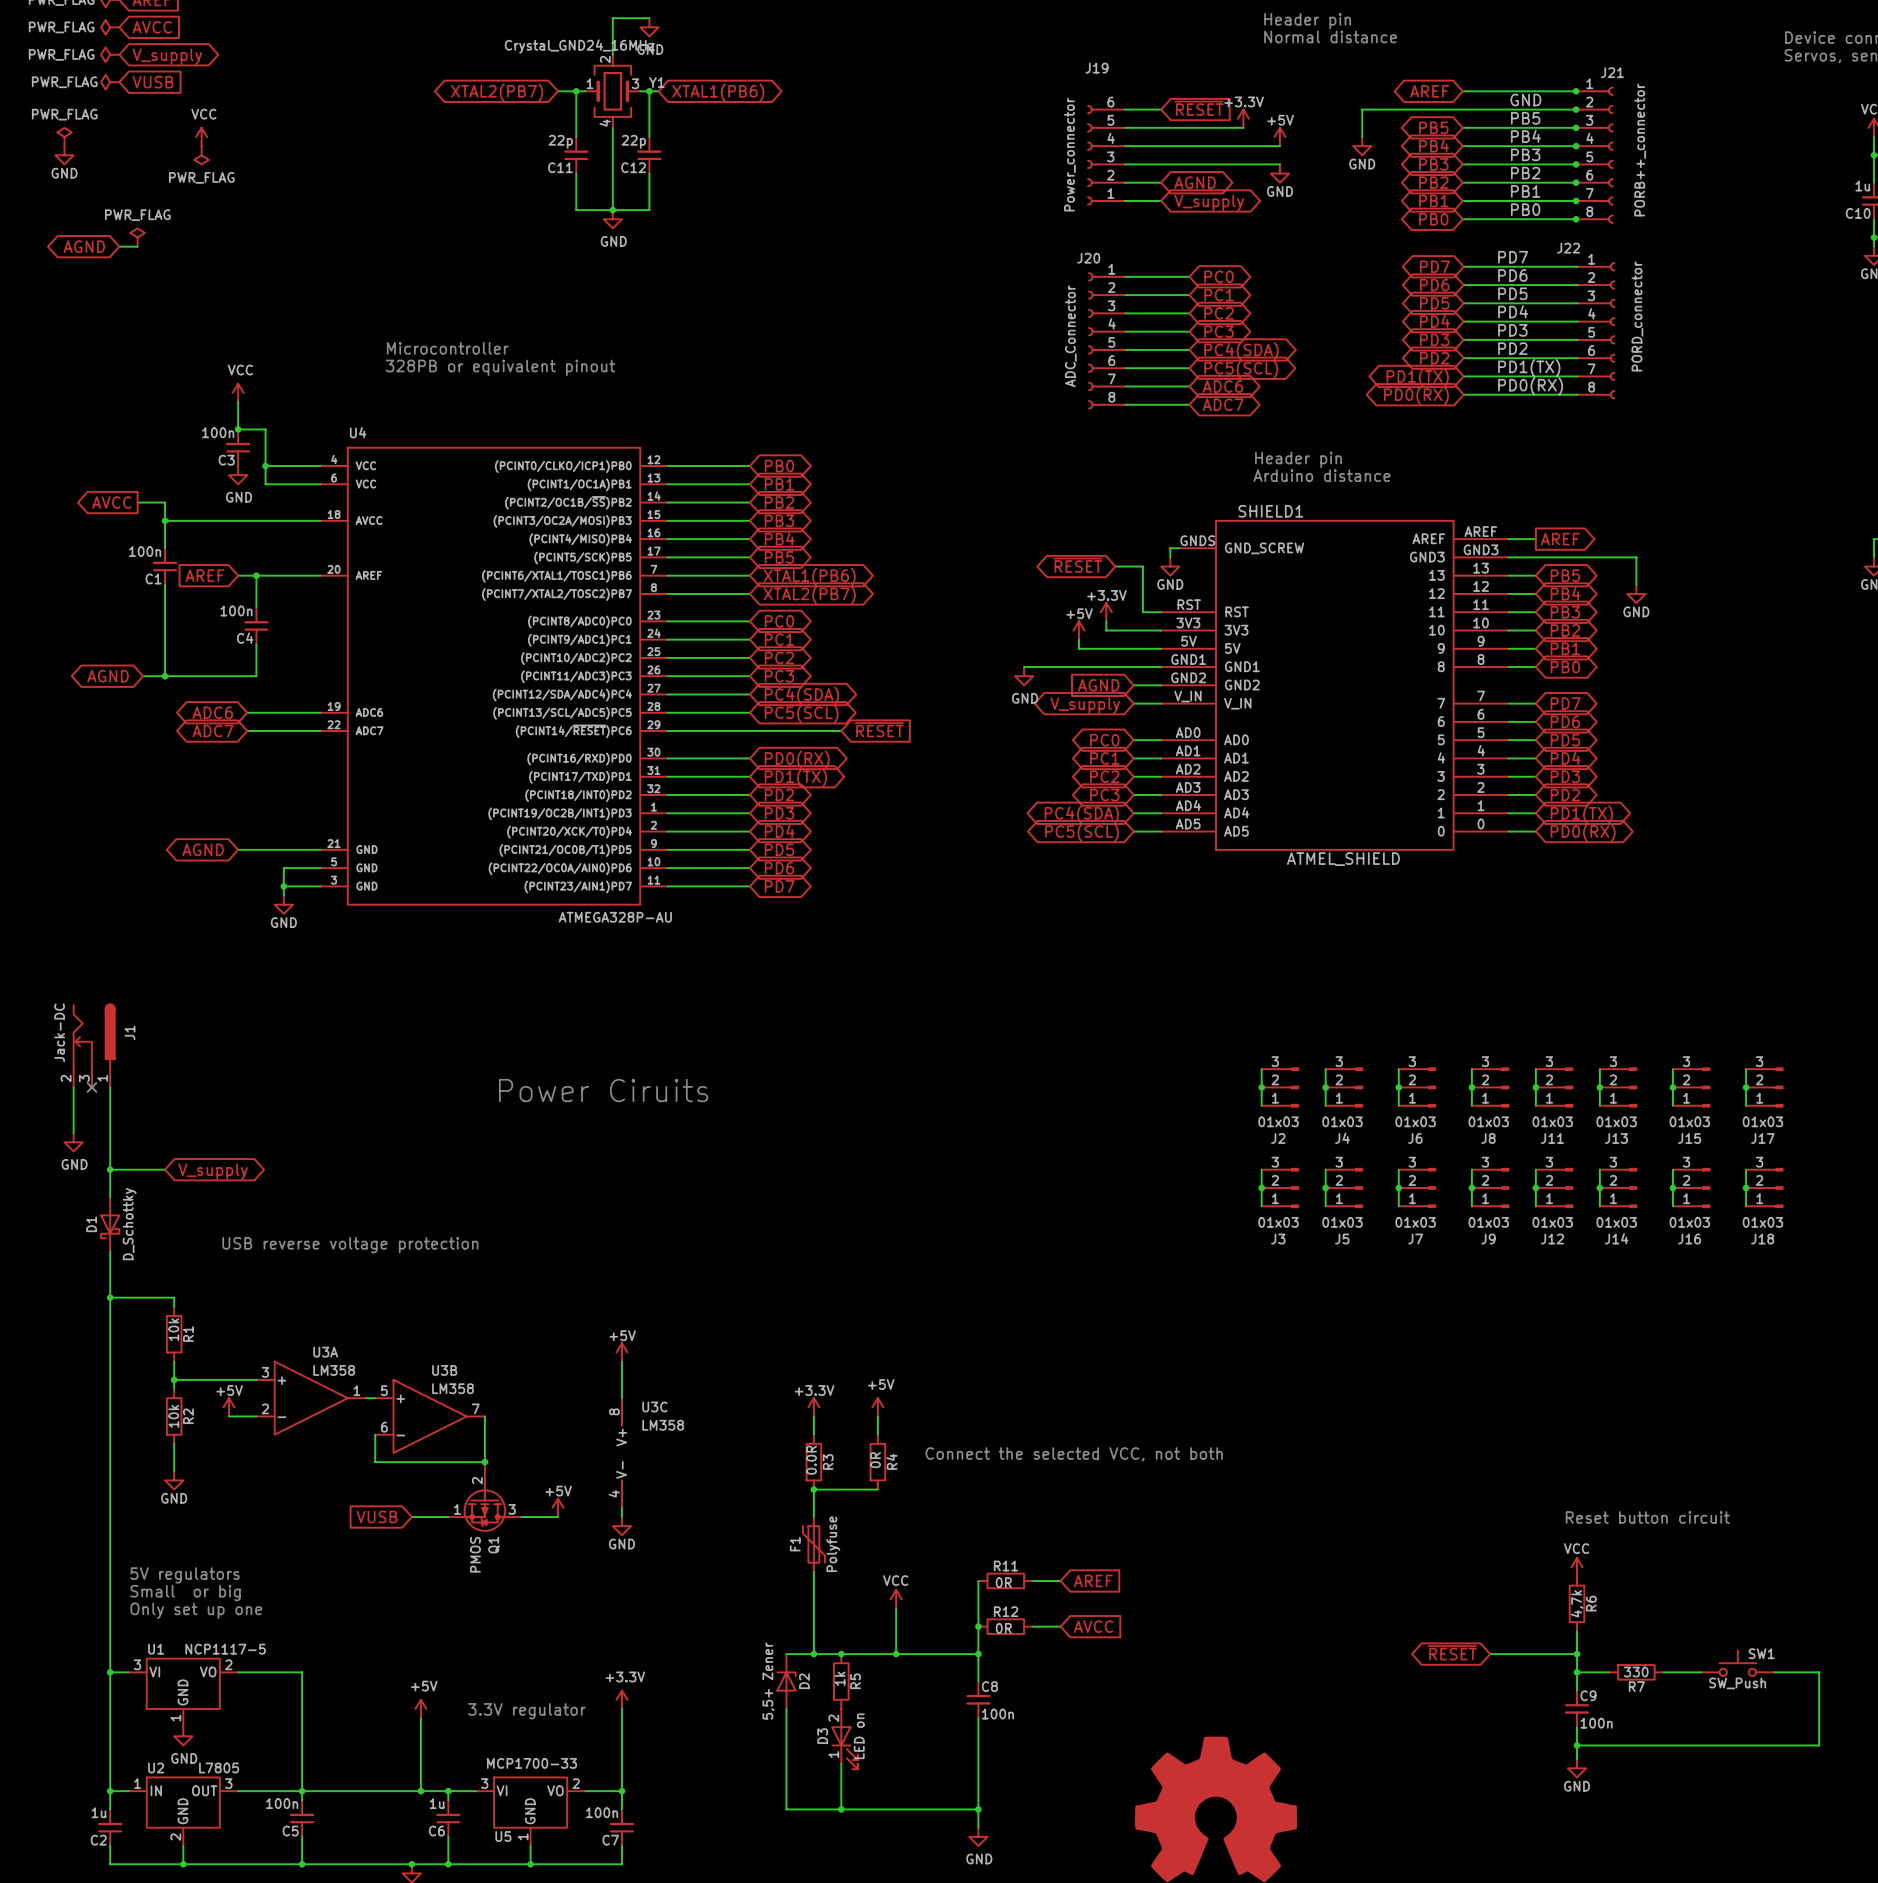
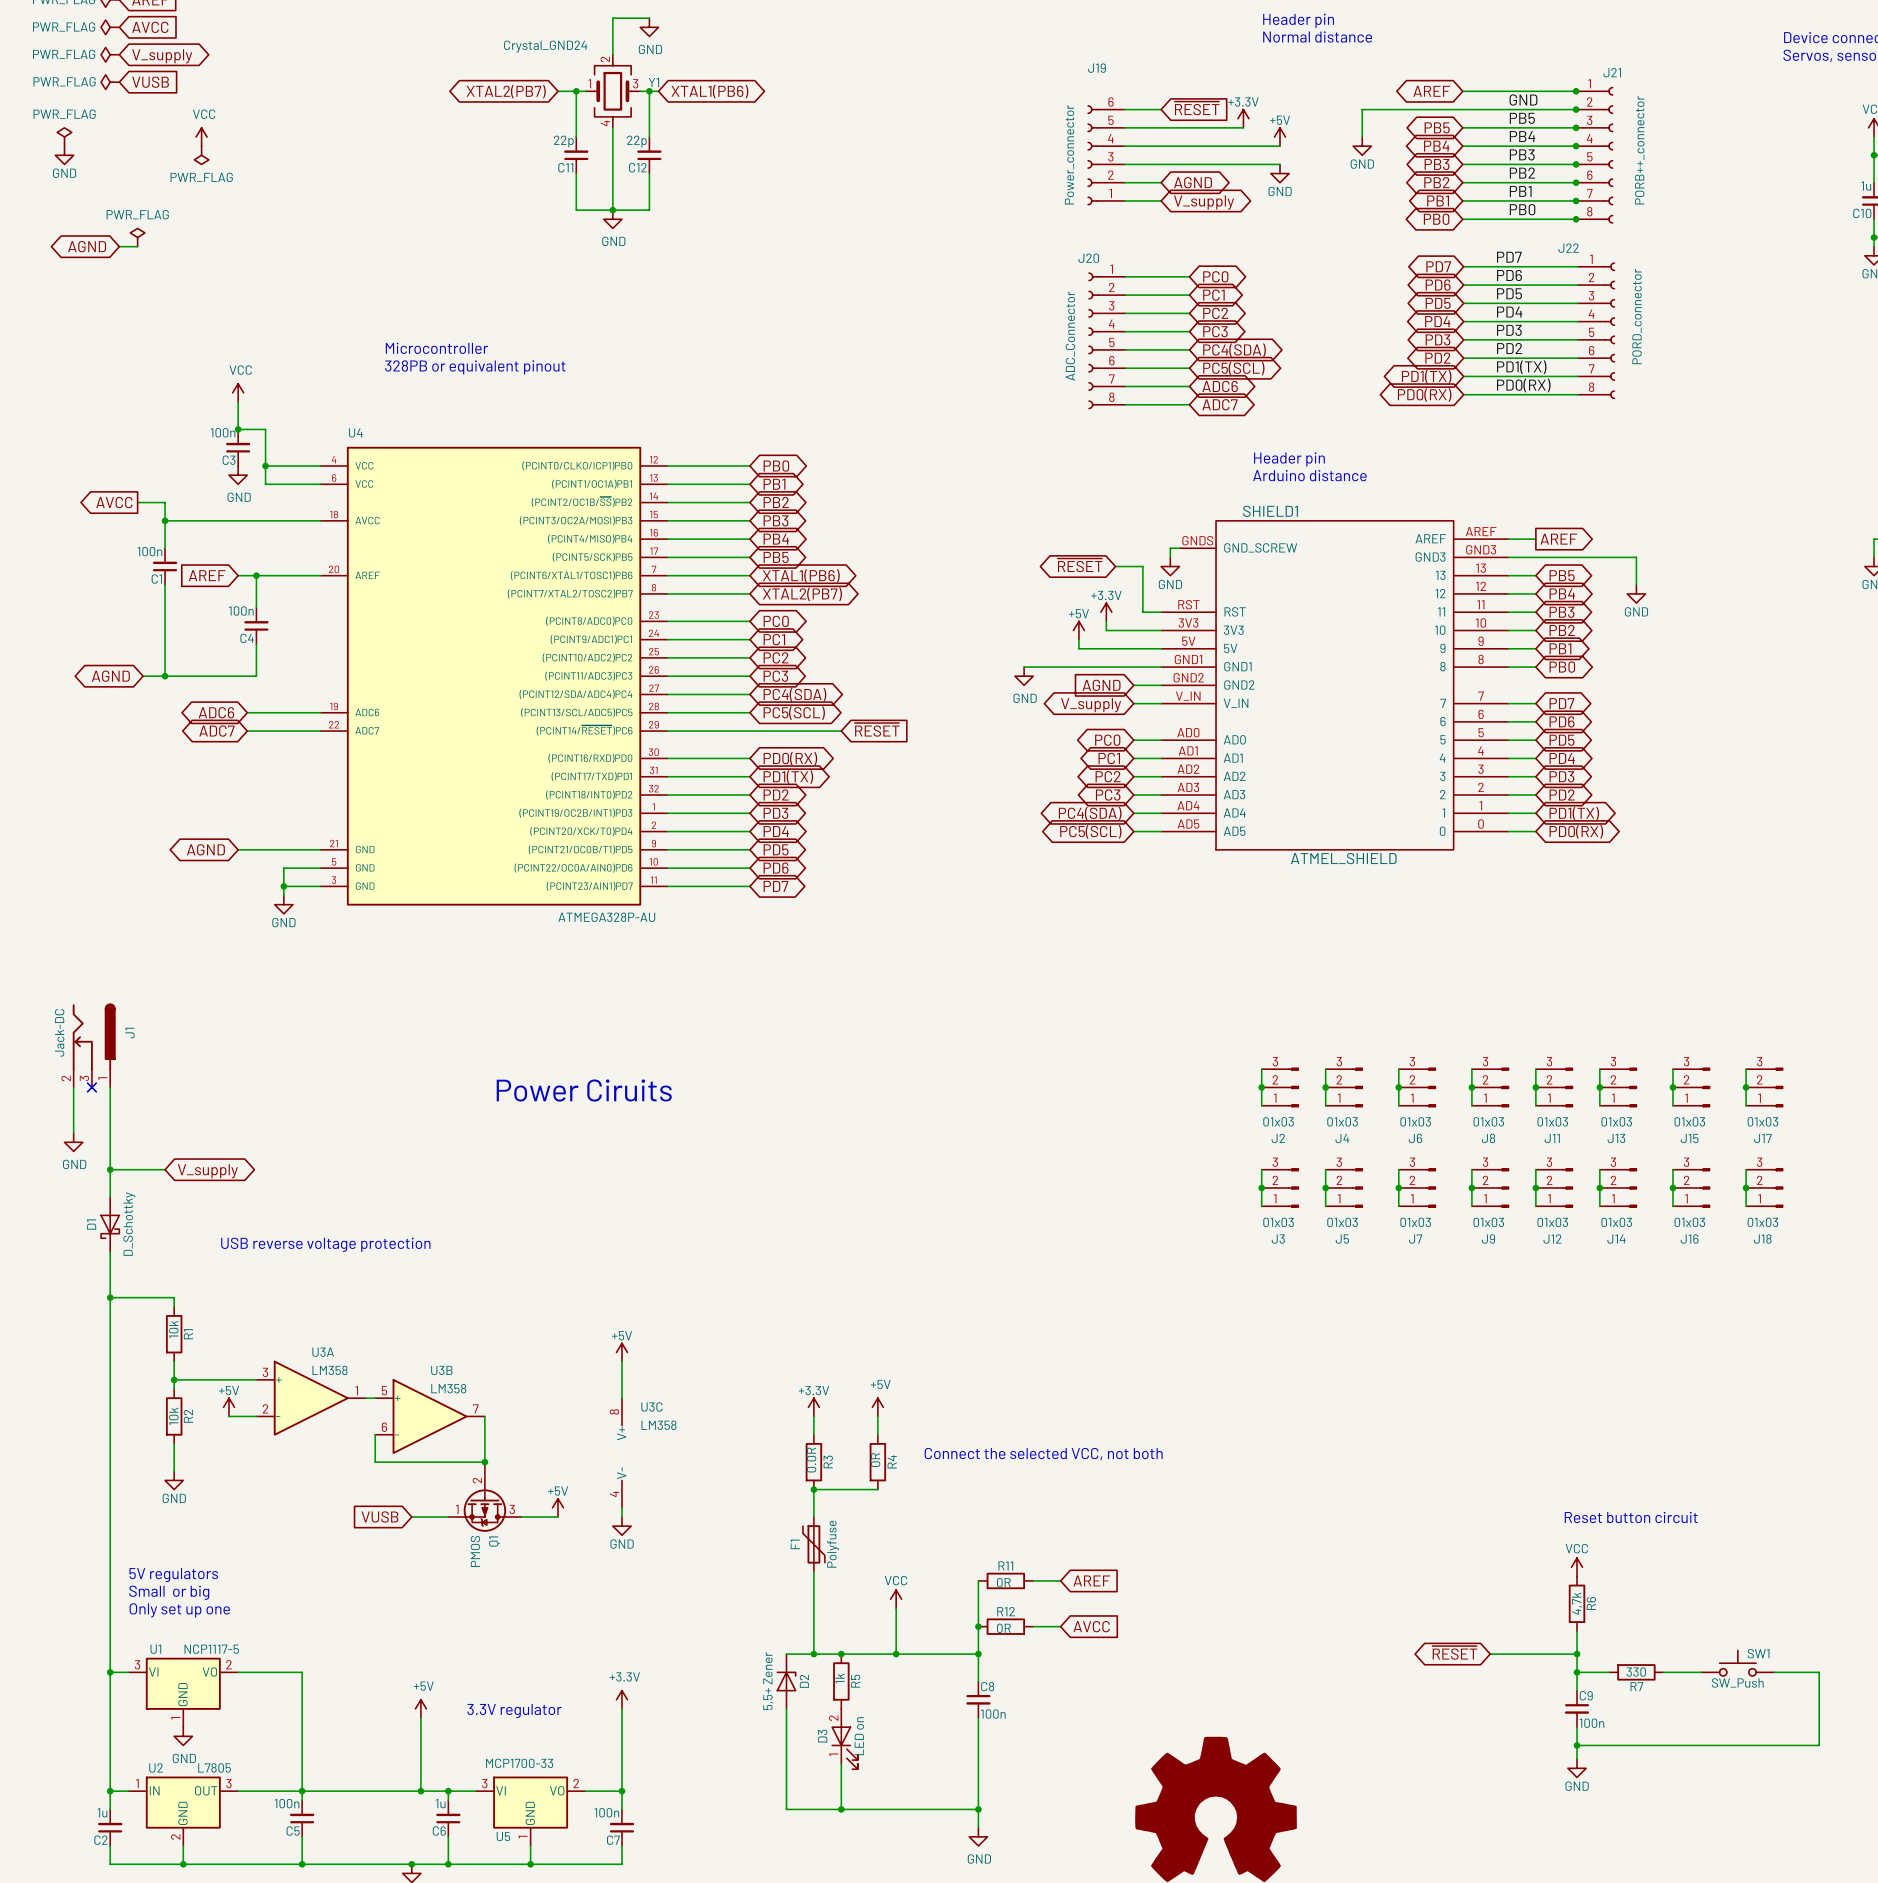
Y1 value: Crystal_GND24_16MHz (579, 46) -> Crystal_GND24 (545, 46)

